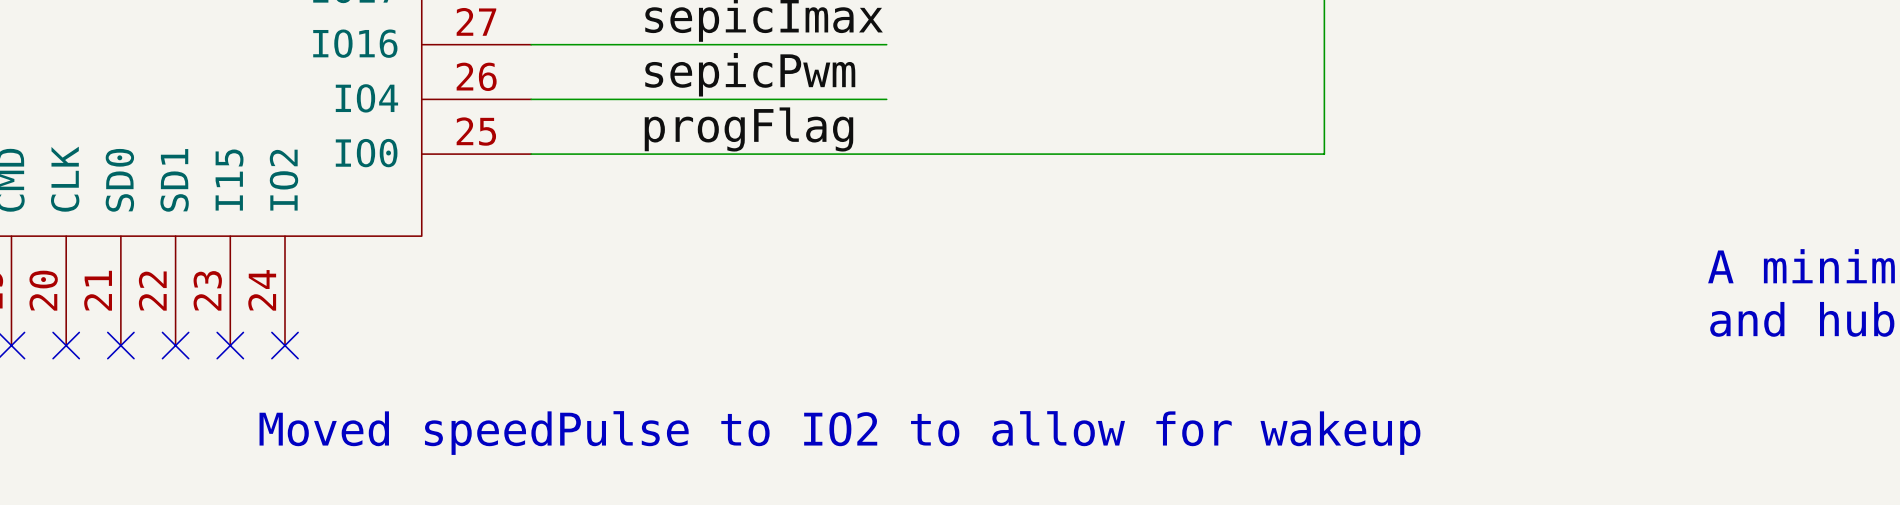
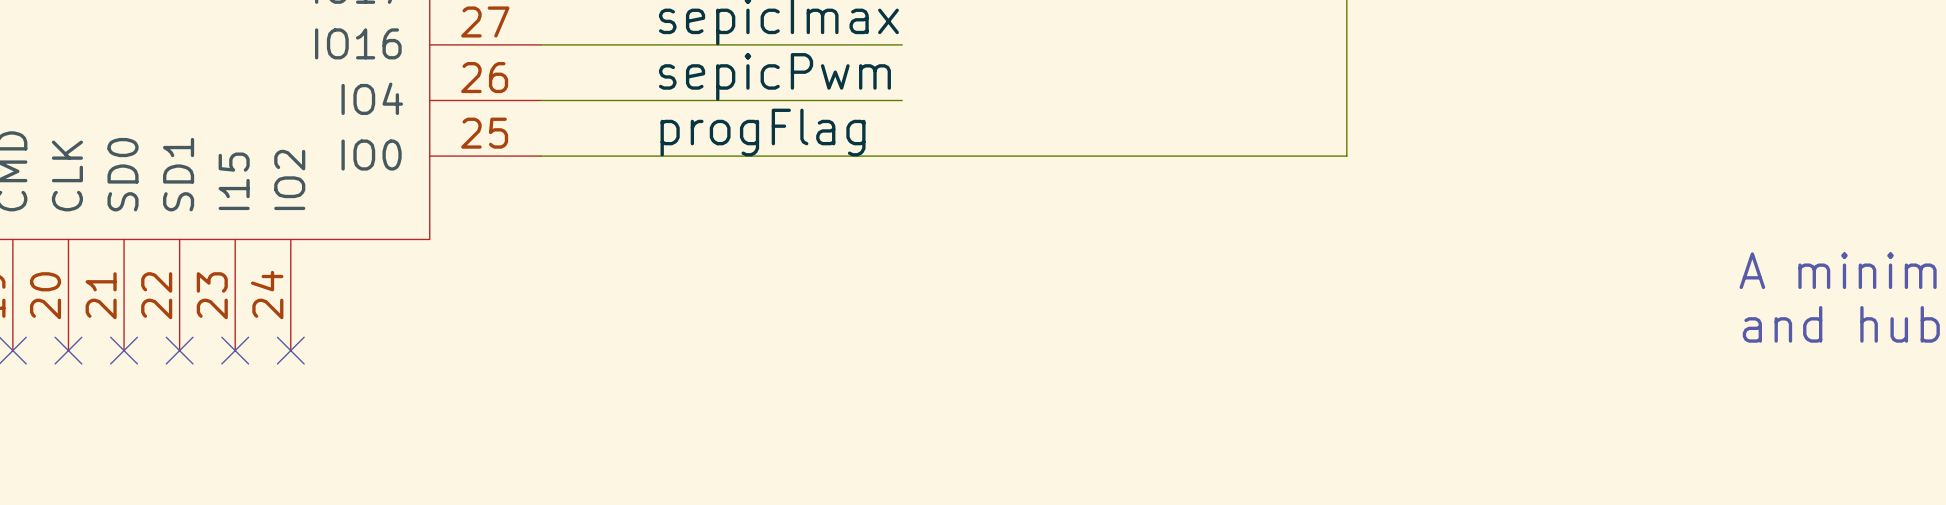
text: Moved speedPulse to IO2 to allow for wakeup (839, 433) -> none

